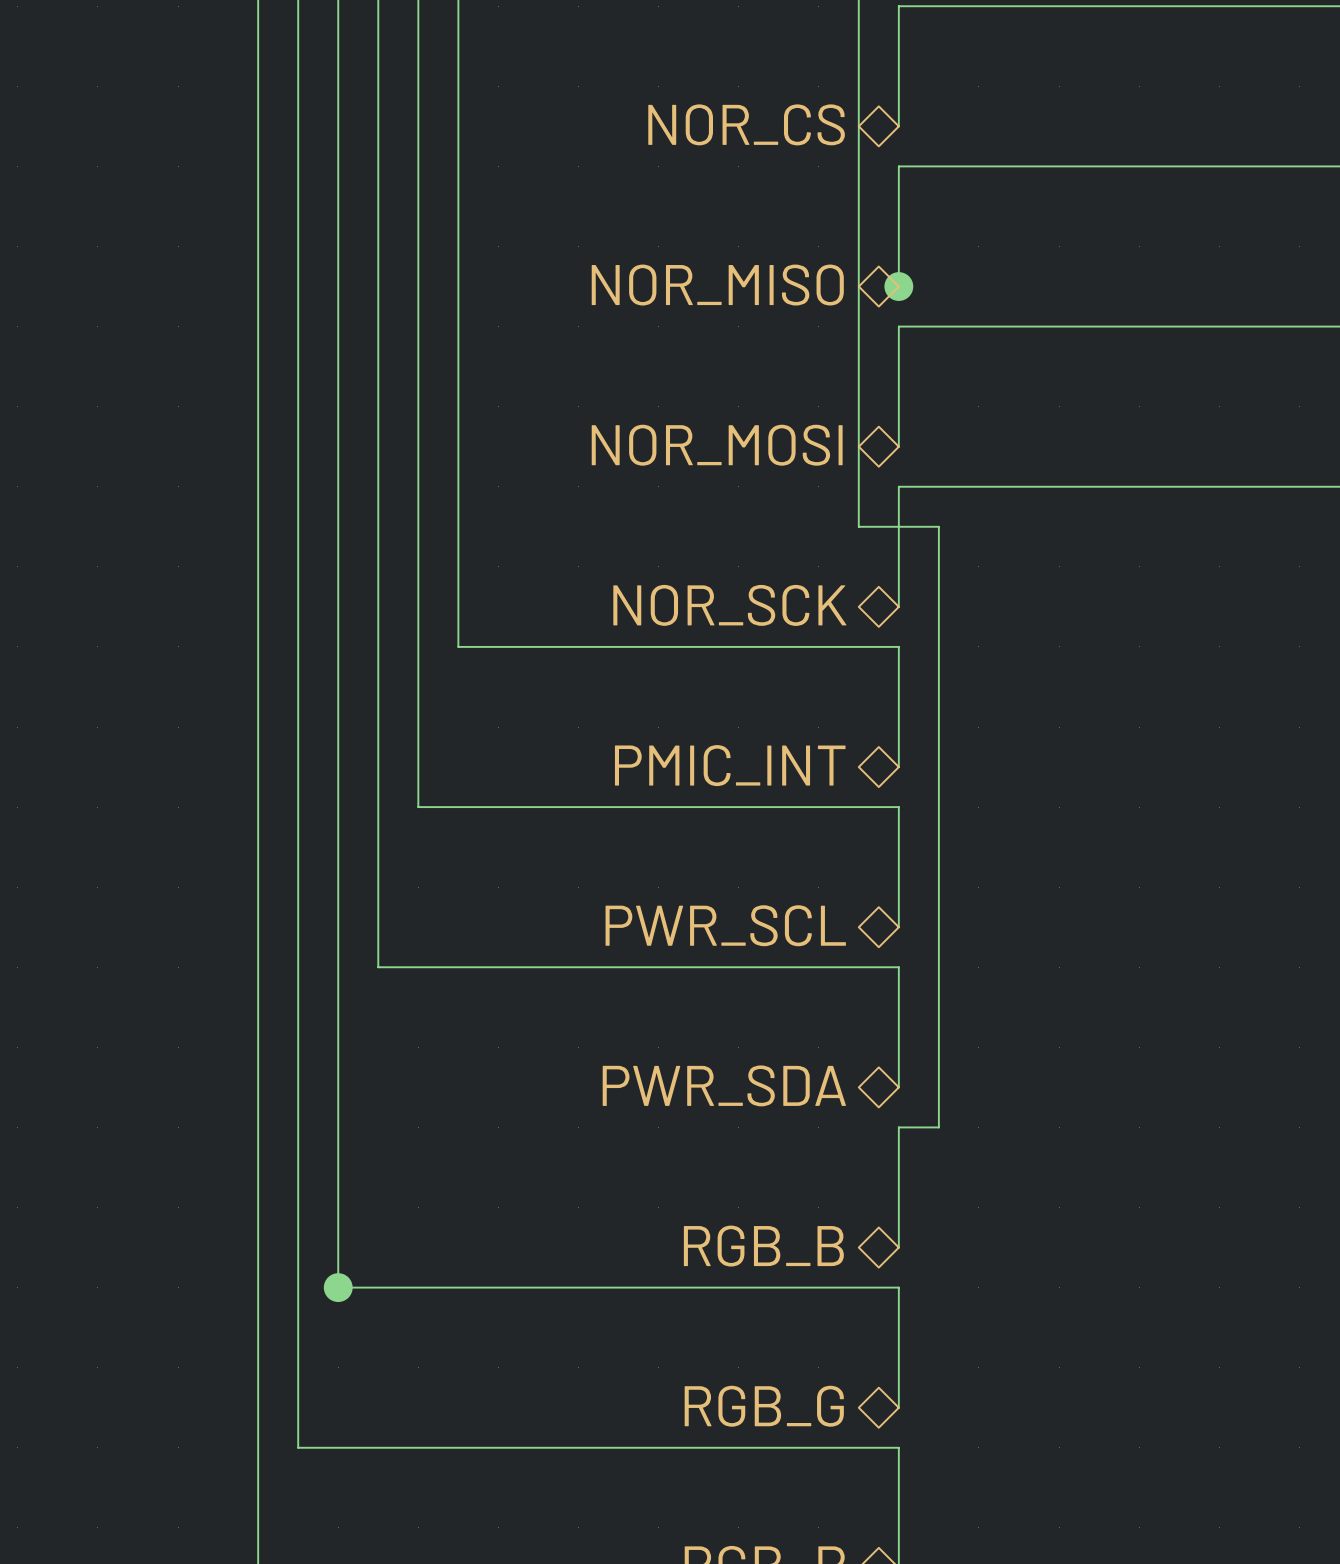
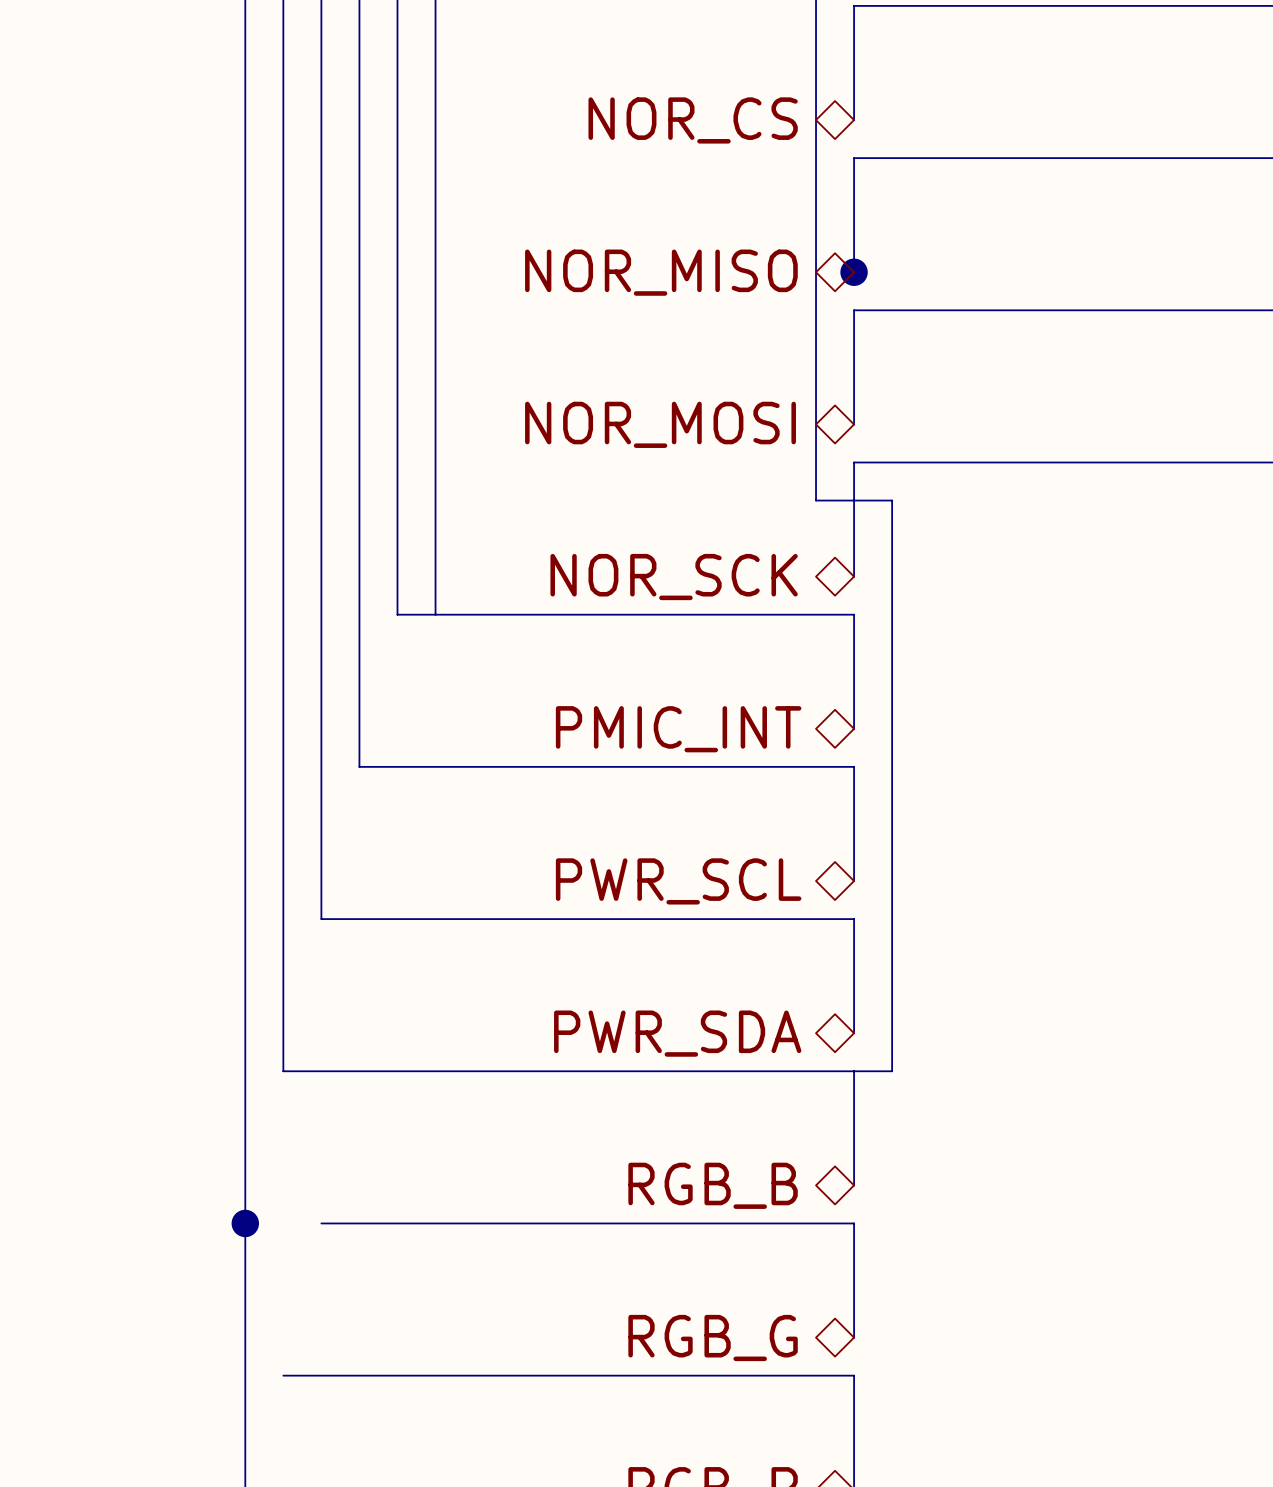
wire: (418, 646) (418, 807) -> (397, 614) (435, 614)
wire: (378, 807) (378, 967) -> (359, 766) (397, 766)
wire: (338, 967) (338, 1287) -> (321, 919) (359, 919)
wire: (298, 1127) (298, 1447) -> (283, 1071) (854, 1071)
junction position: (338, 1287) -> (245, 1223)

